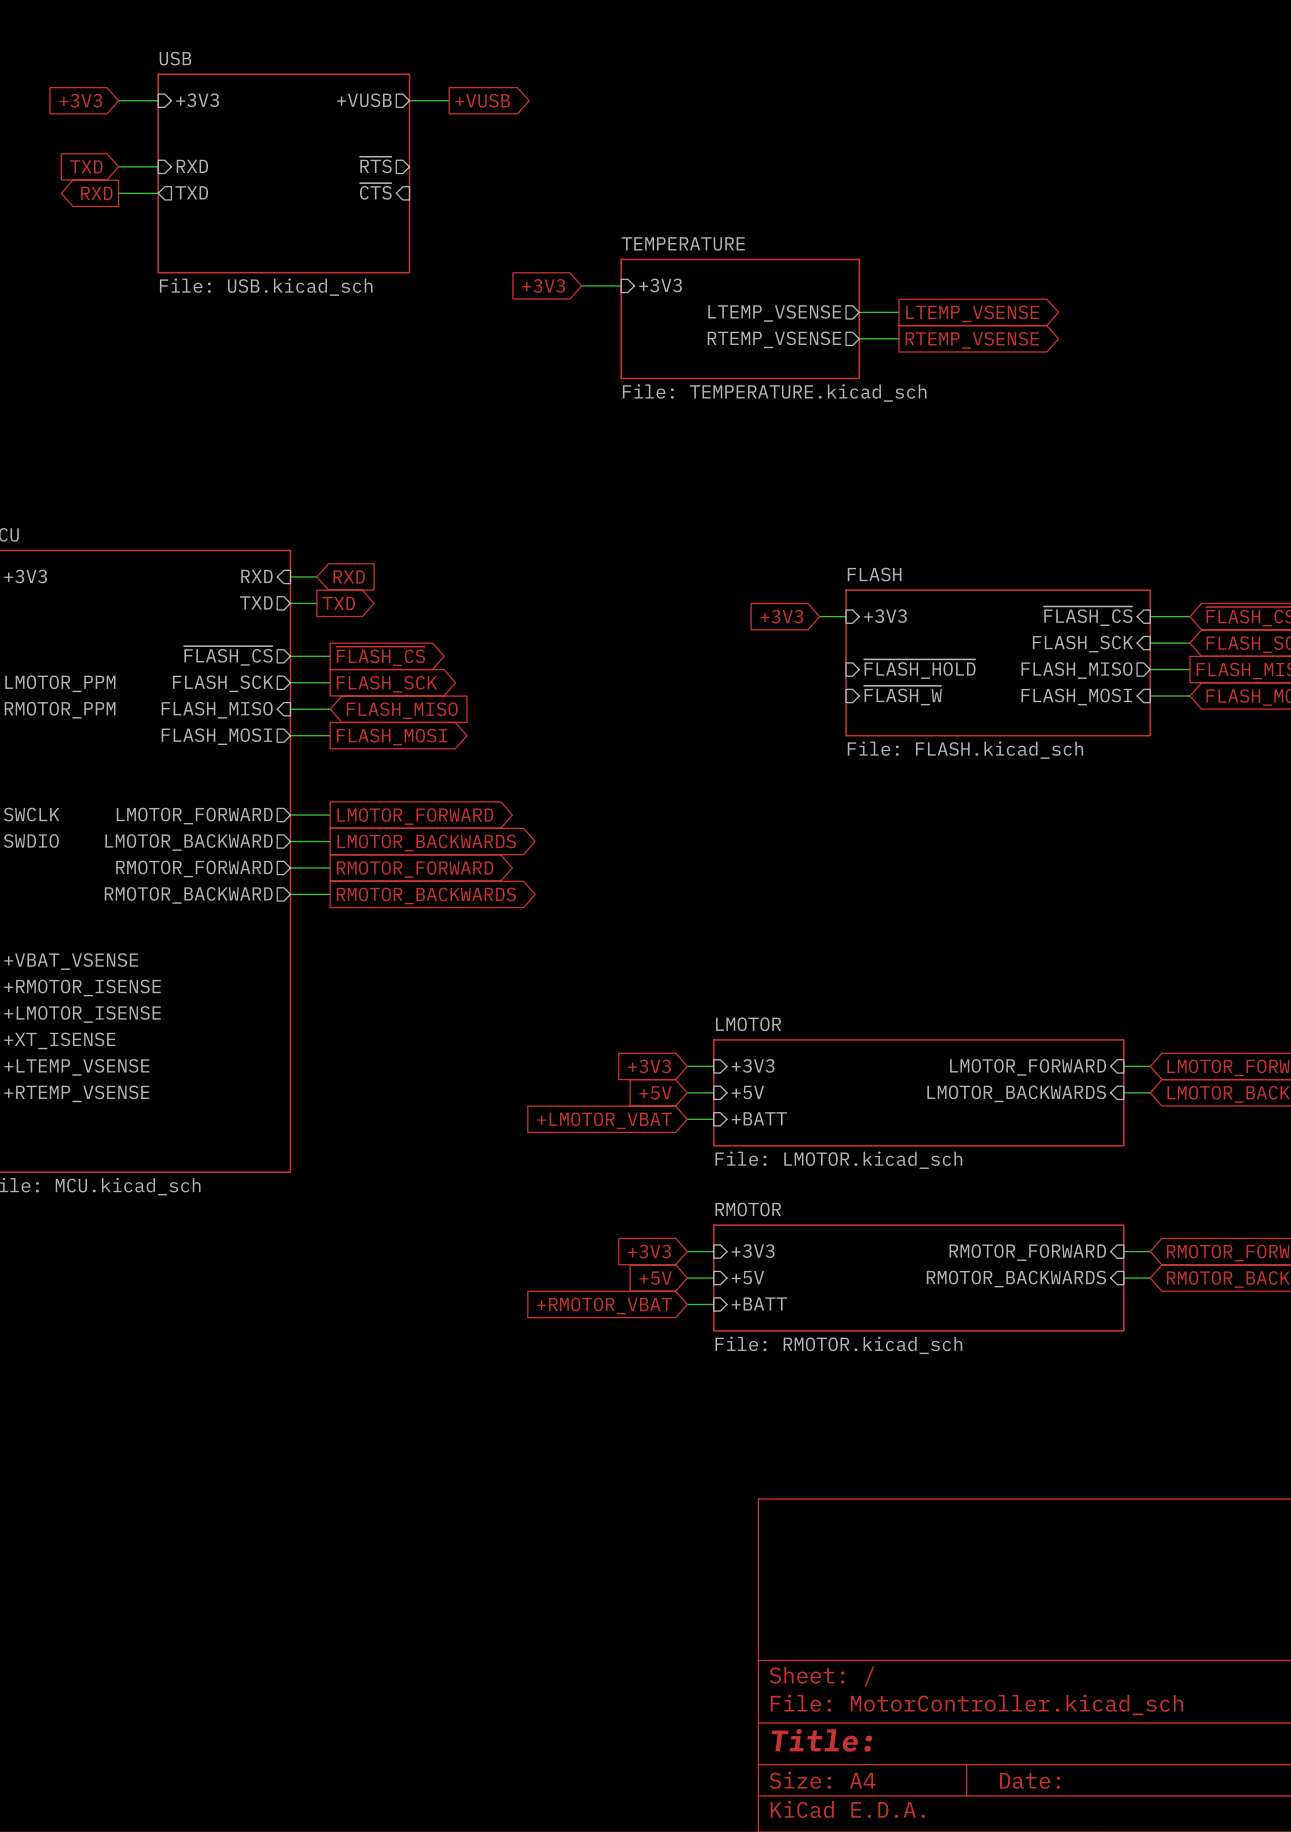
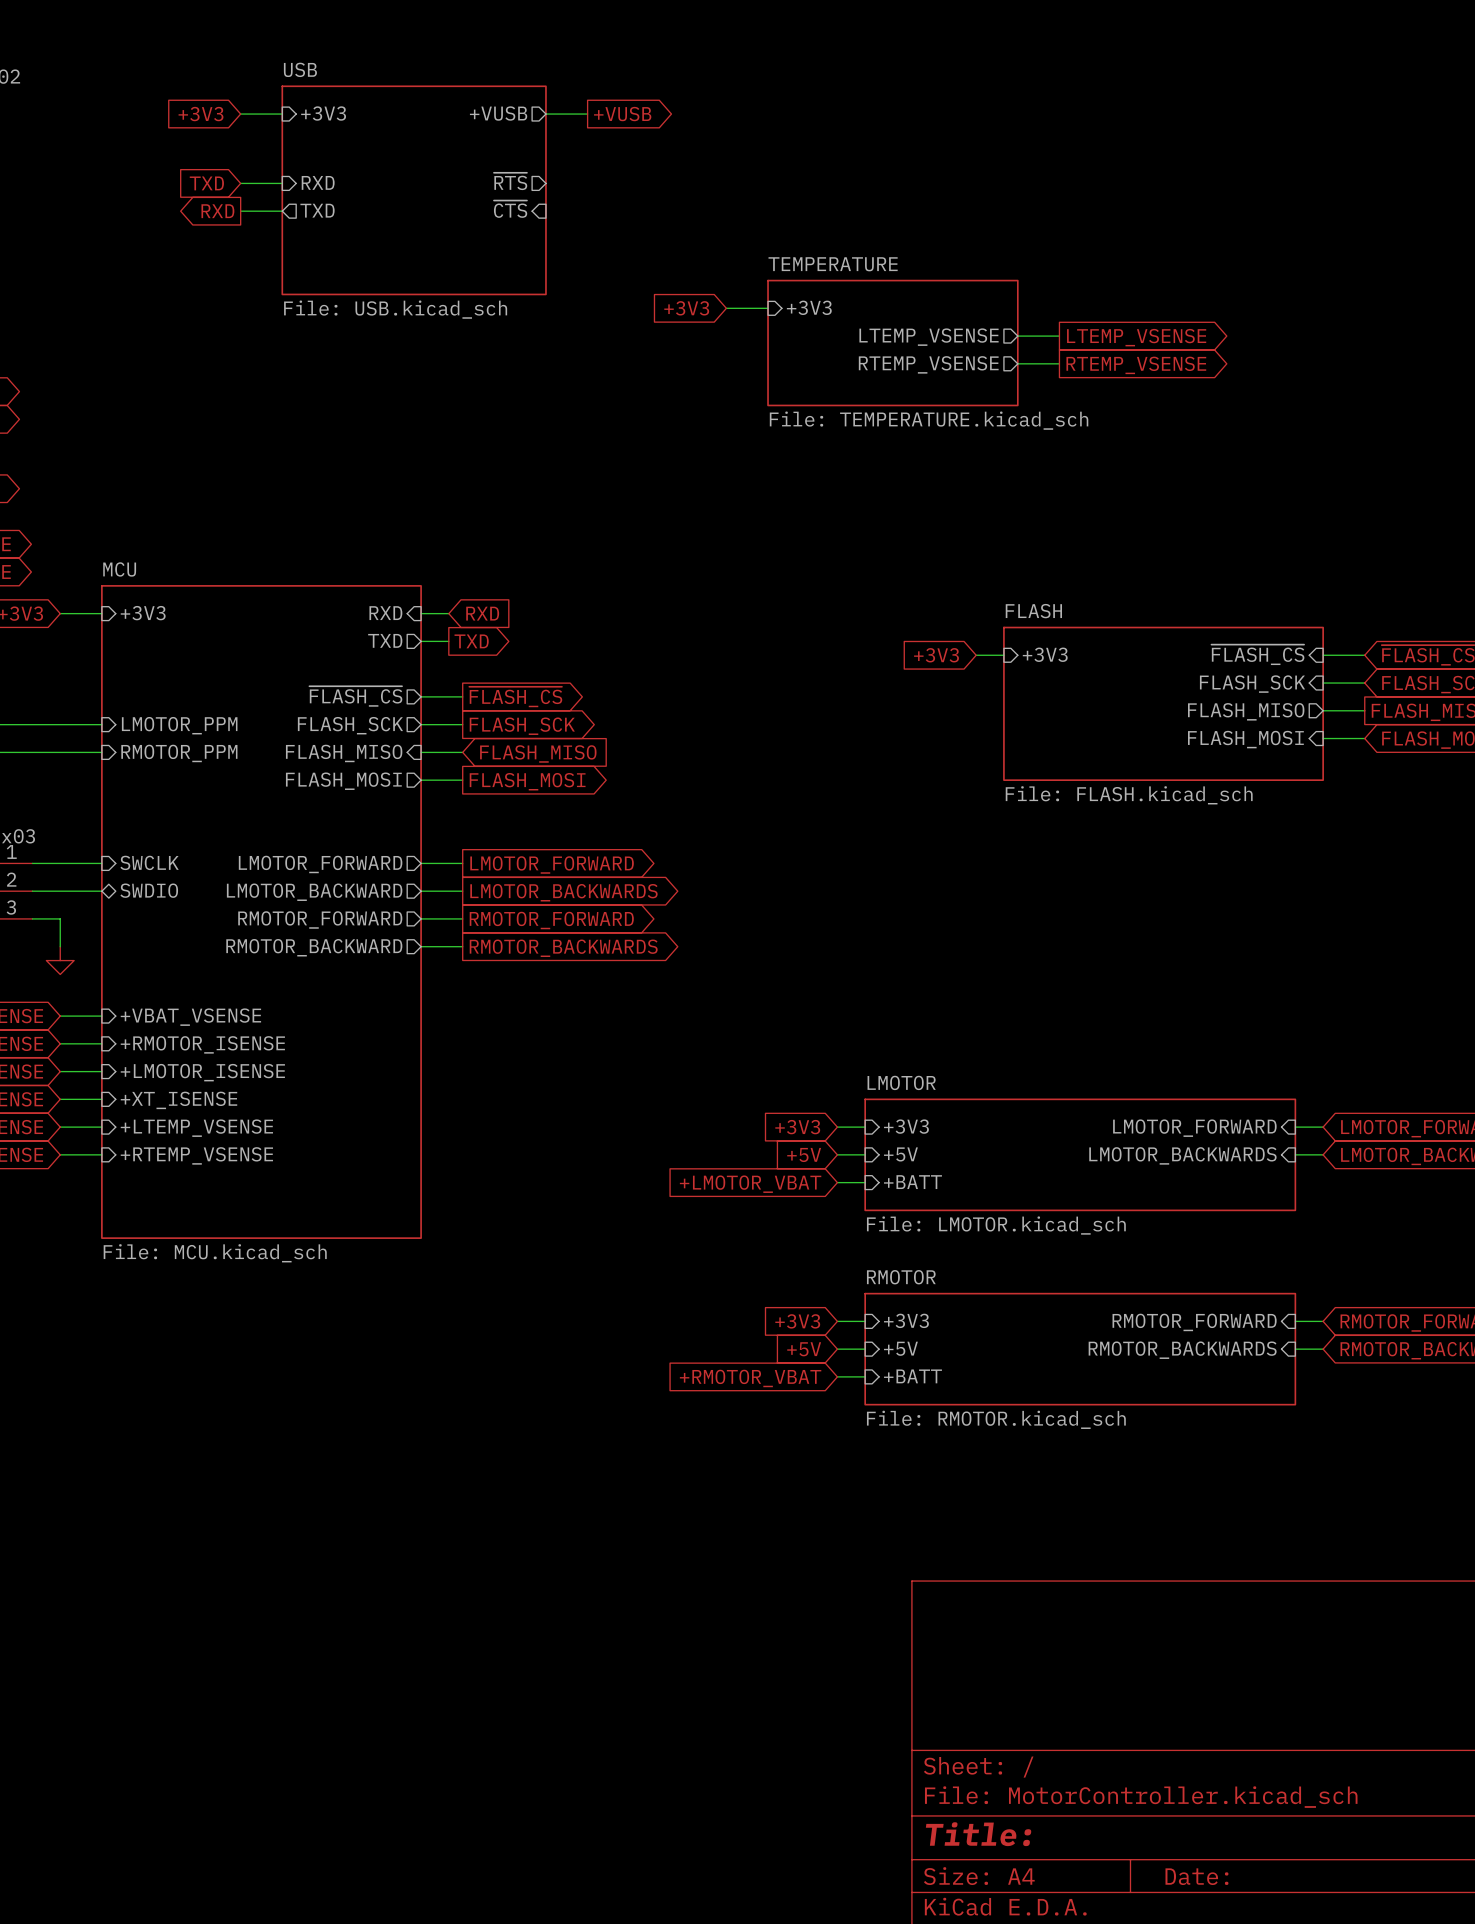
sheet pin: ~{FLASH_HOLD} (919, 669) -> none
sheet pin: ~{FLASH_W} (902, 695) -> none

